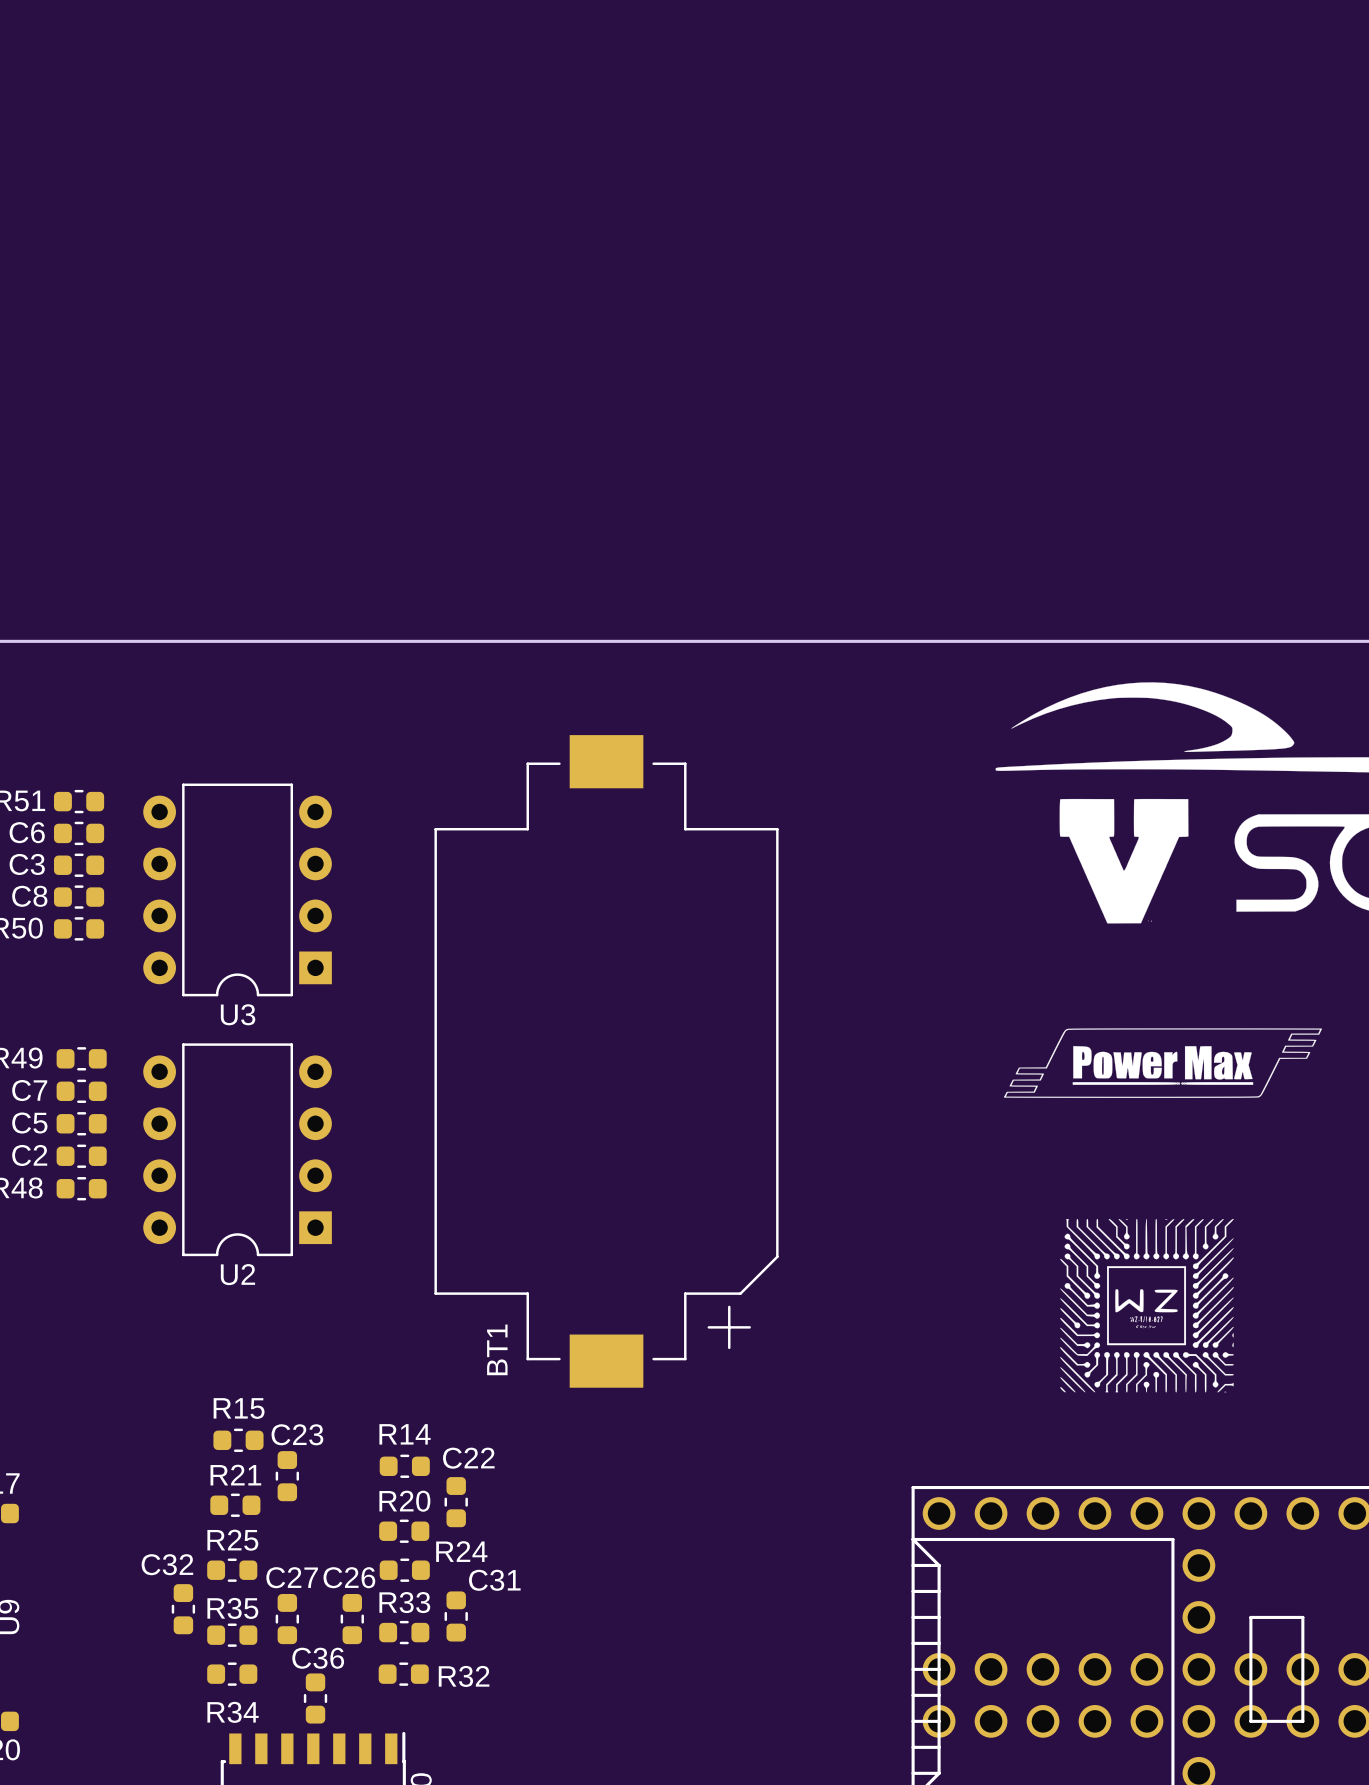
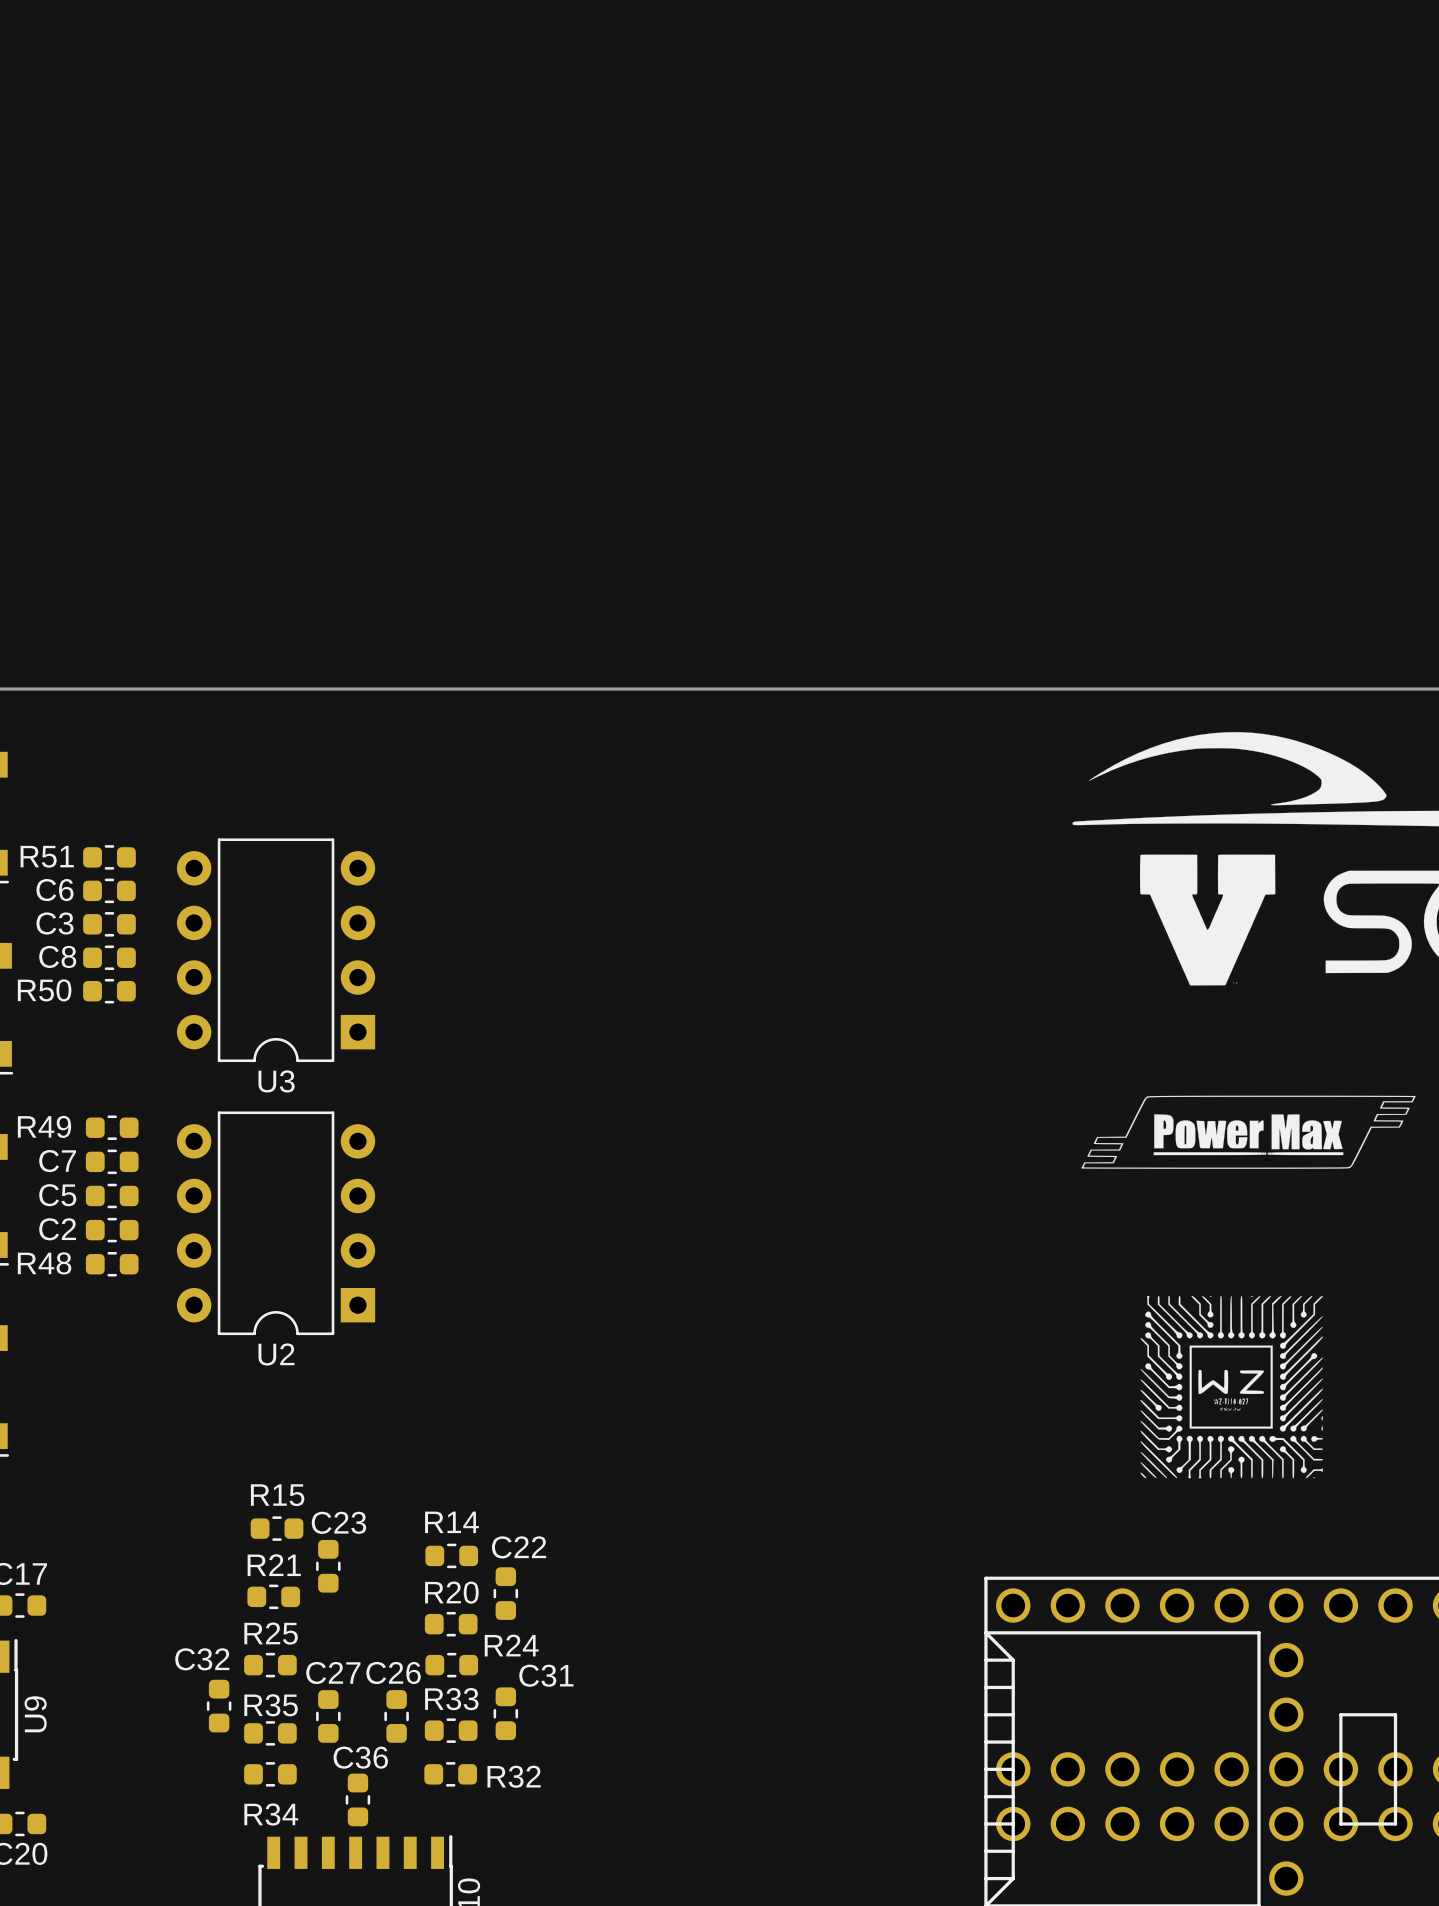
BT1: (606, 1061) -> none

